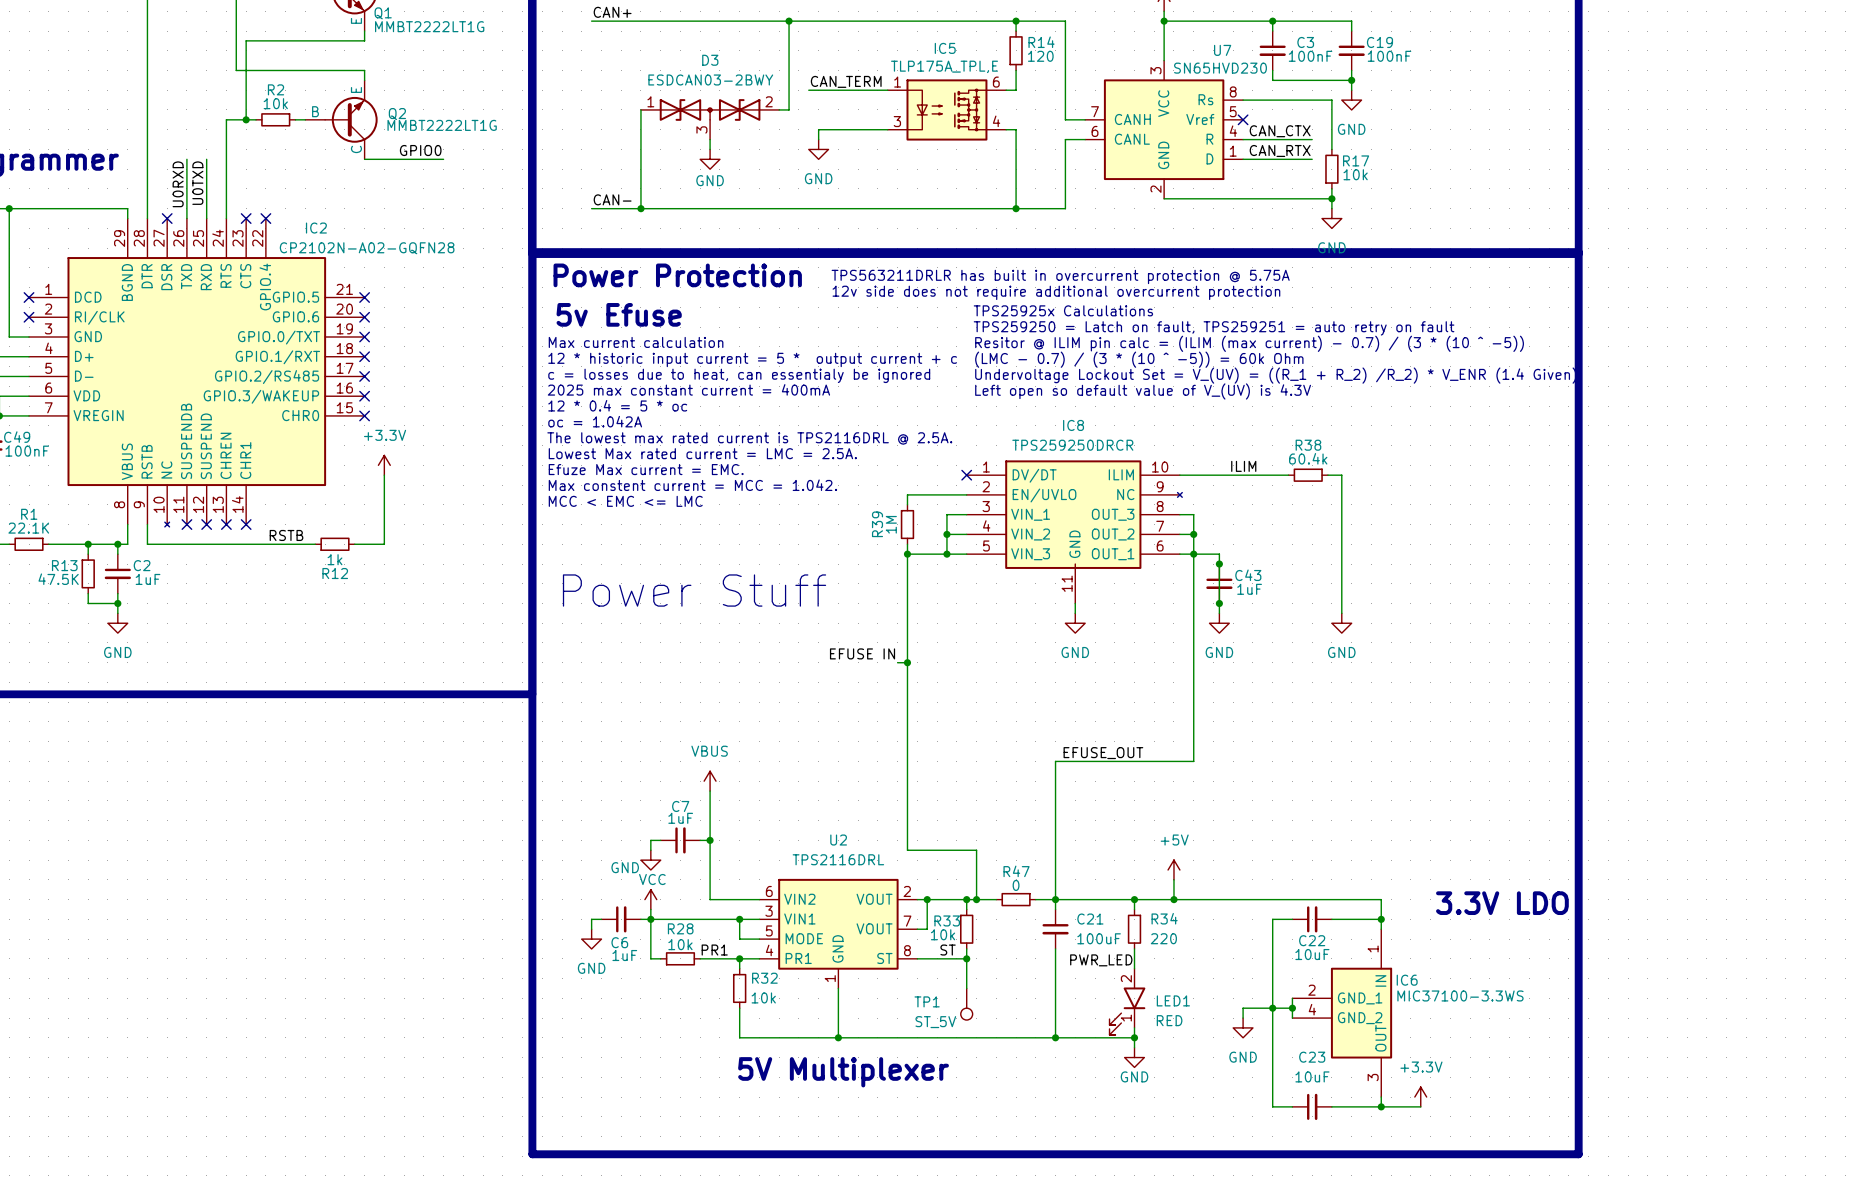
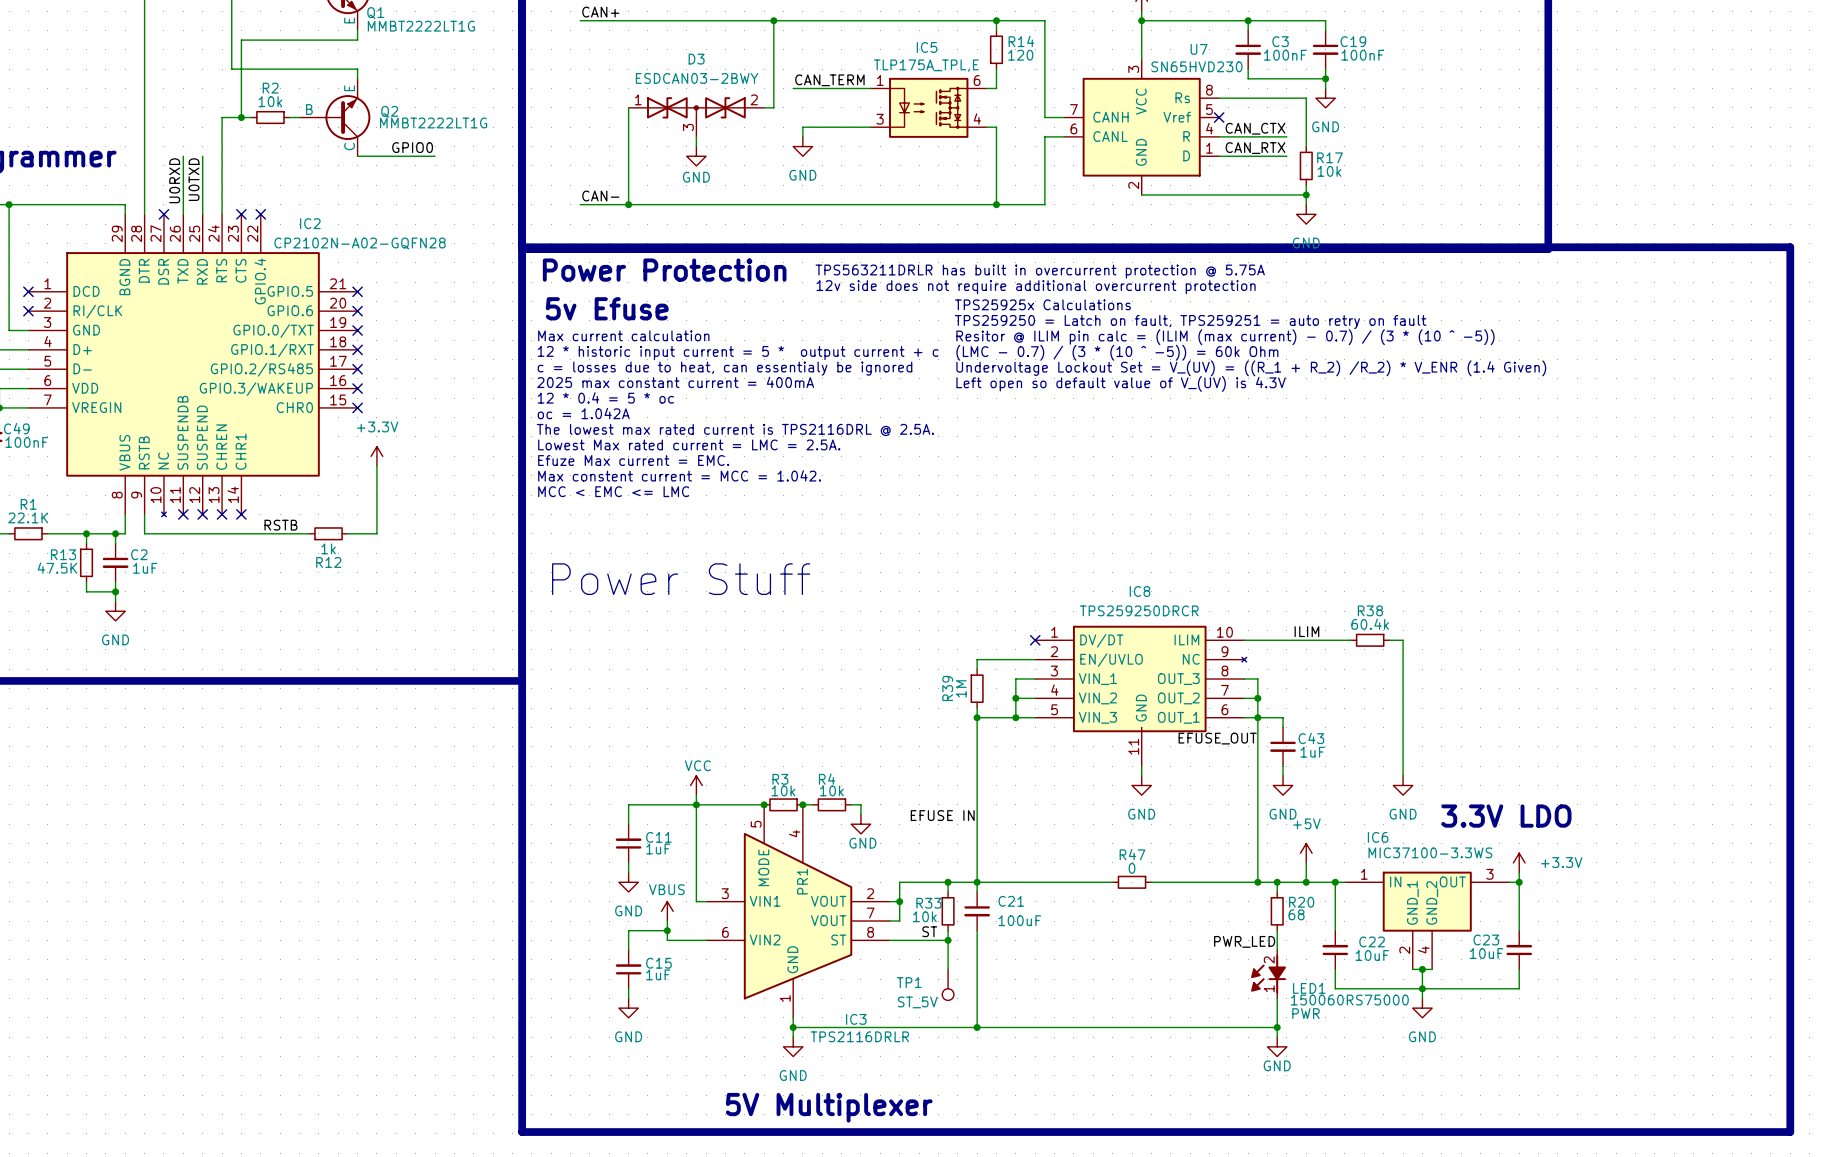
line: (1578, 252) (1578, 1154) -> (1548, 247) (1790, 247) (1790, 1132) (1548, 1132)
label: ILIM (1243, 466) -> none
no-connect mark: (966, 475) -> none
wire: (1179, 475) (1288, 475) -> none
R38 position: (1308, 475) -> (1370, 640)
wire: (1327, 475) (1341, 475) (1341, 613) -> none
wire: (966, 494) (907, 494) (907, 504) -> none
wire: (966, 514) (946, 514) (946, 554) -> none
wire: (1179, 514) (1193, 514) (1193, 761) (1055, 761) (1055, 909) -> none
R39 position: (907, 524) -> (977, 688)
IC8 position: (1074, 531) -> (1140, 695)
wire: (946, 534) (966, 534) -> none
junction: (946, 534) -> none
wire: (1179, 534) (1193, 534) -> none
junction: (1193, 534) -> none
wire: (907, 544) (907, 850) (976, 850) (976, 899) -> none
wire: (907, 554) (966, 554) -> none
junction: (907, 554) -> none
junction: (946, 554) -> none
wire: (1179, 554) (1219, 554) (1219, 613) -> none
junction: (1193, 554) -> none
junction: (1219, 564) -> none
C43 position: (1219, 583) -> (1283, 746)
wire: (1075, 603) (1075, 613) -> none
junction: (1219, 603) -> none
power symbol: GND (1075, 623) -> none
power symbol: GND (1219, 623) -> none
power symbol: GND (1341, 623) -> none
label: none -> ILIM (1306, 631)
no-connect mark: none -> (1035, 640)
wire: none -> (1244, 640) (1350, 640)
wire: none -> (1389, 640) (1403, 640) (1403, 775)
label: EFUSE IN (862, 653) -> none
wire: (897, 662) (907, 662) -> none
junction: (907, 662) -> none
wire: none -> (1035, 659) (977, 659) (977, 669)
wire: none -> (1035, 679) (1015, 679) (1015, 717)
wire: none -> (1244, 679) (1257, 679) (1257, 882)
wire: none -> (1015, 698) (1035, 698)
junction: none -> (1015, 698)
wire: none -> (1244, 698) (1257, 698)
junction: none -> (1257, 698)
wire: none -> (977, 708) (977, 891)
wire: none -> (977, 717) (1035, 717)
junction: none -> (977, 717)
junction: none -> (1015, 717)
wire: none -> (1244, 717) (1283, 717) (1283, 727)
junction: none -> (1257, 717)
power symbol text position: VBUS (709, 751) -> VBUS (666, 889)
label position: EFUSE_OUT (1103, 753) -> EFUSE_OUT (1217, 738)
power symbol position: VBUS (710, 781) -> VBUS (667, 911)
wire: none -> (1141, 766) (1141, 775)
wire: none -> (1283, 766) (1283, 775)
power symbol: none -> GND (1141, 785)
power symbol: none -> GND (1283, 785)
power symbol: none -> GND (1403, 785)
wire: none -> (764, 804) (628, 804) (628, 824)
junction: none -> (764, 804)
R3: none -> 10k (783, 804)
junction: none -> (802, 804)
R4: none -> 10k (831, 804)
wire: none -> (851, 804) (860, 804) (860, 814)
label: none -> EFUSE IN (942, 815)
wire: (660, 840) (650, 840) (650, 850) -> none
C7: 1uF (680, 840) -> none
wire: (700, 840) (710, 840) -> (802, 804) (812, 804)
junction position: (710, 840) -> (696, 804)
power symbol: none -> GND (860, 824)
C11: none -> 1uF (628, 843)
power symbol: GND (650, 860) -> none
power symbol position: +5V (1173, 870) -> +5V (1306, 853)
wire: none -> (628, 862) (628, 872)
wire: (1173, 879) (1173, 899) (1134, 899) (1134, 909) -> none
wire: none -> (1306, 862) (1306, 882)
power symbol: none -> +3.3V (1519, 862)
wire: none -> (1519, 872) (1519, 930)
power symbol: none -> GND (628, 882)
power symbol position: VCC (650, 899) -> VCC (696, 785)
wire: (710, 899) (759, 899) -> (696, 882) (696, 901)
wire: none -> (899, 882) (899, 921) (890, 921)
wire: (927, 899) (927, 929) (917, 929) -> none
junction position: (927, 899) -> (899, 901)
junction position: (976, 899) -> (977, 882)
wire: none -> (977, 882) (1015, 882)
R47 position: (1016, 899) -> (1132, 882)
junction: (1055, 899) -> none
junction: (1134, 899) -> none
junction: (1173, 899) -> none
junction: none -> (1257, 882)
wire: none -> (1277, 882) (1277, 891)
junction: none -> (1277, 882)
junction: none -> (1306, 882)
wire: none -> (1335, 882) (1335, 930)
junction: none -> (1335, 882)
wire: (1371, 899) (1381, 899) (1381, 929) -> none
wire: none -> (1509, 882) (1519, 882)
junction: none -> (1519, 882)
text position: 3.3V LDO (1502, 903) -> 3.3V LDO (1506, 816)
wire: (650, 909) (650, 958) (660, 958) -> none
wire: (601, 919) (591, 919) (591, 929) -> none
C6: 1uF (621, 919) -> none
wire: (640, 919) (710, 919) -> none
junction: (650, 919) -> none
wire: (739, 919) (739, 939) (759, 939) -> (667, 921) (667, 940) (686, 940)
junction: (739, 919) -> none
wire: none -> (890, 901) (899, 901)
wire: (1292, 919) (1272, 919) (1272, 1106) (1292, 1106) -> none
C22 rotation: 0° (1312, 919) -> 90° counterclockwise (1335, 950)
C22 position: (1312, 919) -> (1335, 950)
wire: (1331, 919) (1381, 919) -> none
junction: (1381, 919) -> none
IC3: none -> TPS2116DRLR (798, 911)
C21 position: (1055, 929) -> (977, 911)
R34: 220 (1134, 929) -> none
R20: none -> 68 (1277, 911)
U2: TPS2116DRL (838, 933) -> none
power symbol: GND (591, 939) -> none
C22 name position: C22 (1312, 940) -> C22 (1372, 941)
wire: none -> (667, 930) (628, 930) (628, 950)
junction: none -> (667, 930)
wire: none -> (977, 930) (977, 1027)
wire: (1055, 948) (1055, 1037) -> none
wire: (1134, 948) (1134, 968) -> none
label: PR1 (714, 950) -> none
R28: 10k (680, 958) -> none
wire: (739, 958) (739, 968) -> (628, 988) (628, 998)
junction: (739, 958) -> none
label position: PWR_LED (1101, 960) -> PWR_LED (1244, 941)
LED1 symbol: [1109, 968, 1146, 1035] -> [1251, 950, 1286, 999]
IC6 name position: IC6 (1407, 980) -> IC6 (1378, 837)
C15: none -> 1uF (628, 969)
R32: 10k (739, 988) -> none
wire: (838, 988) (838, 1037) -> none
wire: none -> (1335, 969) (1335, 988) (1519, 988) (1519, 969)
wire: none -> (1412, 969) (1432, 969)
wire: none -> (1422, 969) (1422, 998)
junction: none -> (1422, 969)
IC6 value position: MIC37100-3.3WS (1460, 995) -> MIC37100-3.3WS (1430, 852)
wire: (1292, 998) (1292, 1018) -> (1277, 930) (1277, 950)
LED1 name position: LED1 (1173, 1000) -> LED1 (1309, 988)
wire: (739, 1008) (739, 1037) (1134, 1037) -> none
junction: (1272, 1008) -> none
wire: (1292, 1008) (1243, 1008) (1243, 1018) -> none
junction: (1292, 1008) -> none
junction: none -> (1422, 988)
IC6 position: (1342, 1013) -> (1427, 920)
IC6 rotation: 0° (1361, 1013) -> 90° counterclockwise (1427, 901)
wire: none -> (1277, 998) (1277, 1037)
LED1 value: RED (1169, 1020) -> 150060RS75000 (1349, 1000)
power symbol: none -> GND (628, 1008)
wire: (1134, 1027) (1134, 1047) -> none
power symbol position: GND (1243, 1027) -> GND (1277, 1046)
power symbol: none -> GND (1422, 1008)
LED1 text: none -> PWR (1306, 1013)
wire: none -> (793, 1017) (793, 1037)
junction position: (838, 1037) -> (793, 1027)
junction: (1055, 1037) -> none
junction: (1134, 1037) -> none
wire: none -> (793, 1027) (1277, 1027)
junction: none -> (977, 1027)
junction: none -> (1277, 1027)
power symbol: GND (1134, 1057) -> none
power symbol text position: GND (1243, 1057) -> GND (1277, 1065)
C23 name position: C23 (1312, 1057) -> C23 (1486, 940)
power symbol: none -> GND (793, 1046)
text position: 5V Multiplexer (843, 1072) -> 5V Multiplexer (829, 1107)
wire: (1381, 1097) (1381, 1106) -> none
power symbol: +3.3V (1420, 1097) -> none
C23 rotation: 0° (1312, 1106) -> 90° counterclockwise (1519, 950)
C23 position: (1312, 1106) -> (1519, 950)
wire: (1331, 1106) (1420, 1106) -> none
junction: (1381, 1106) -> none

